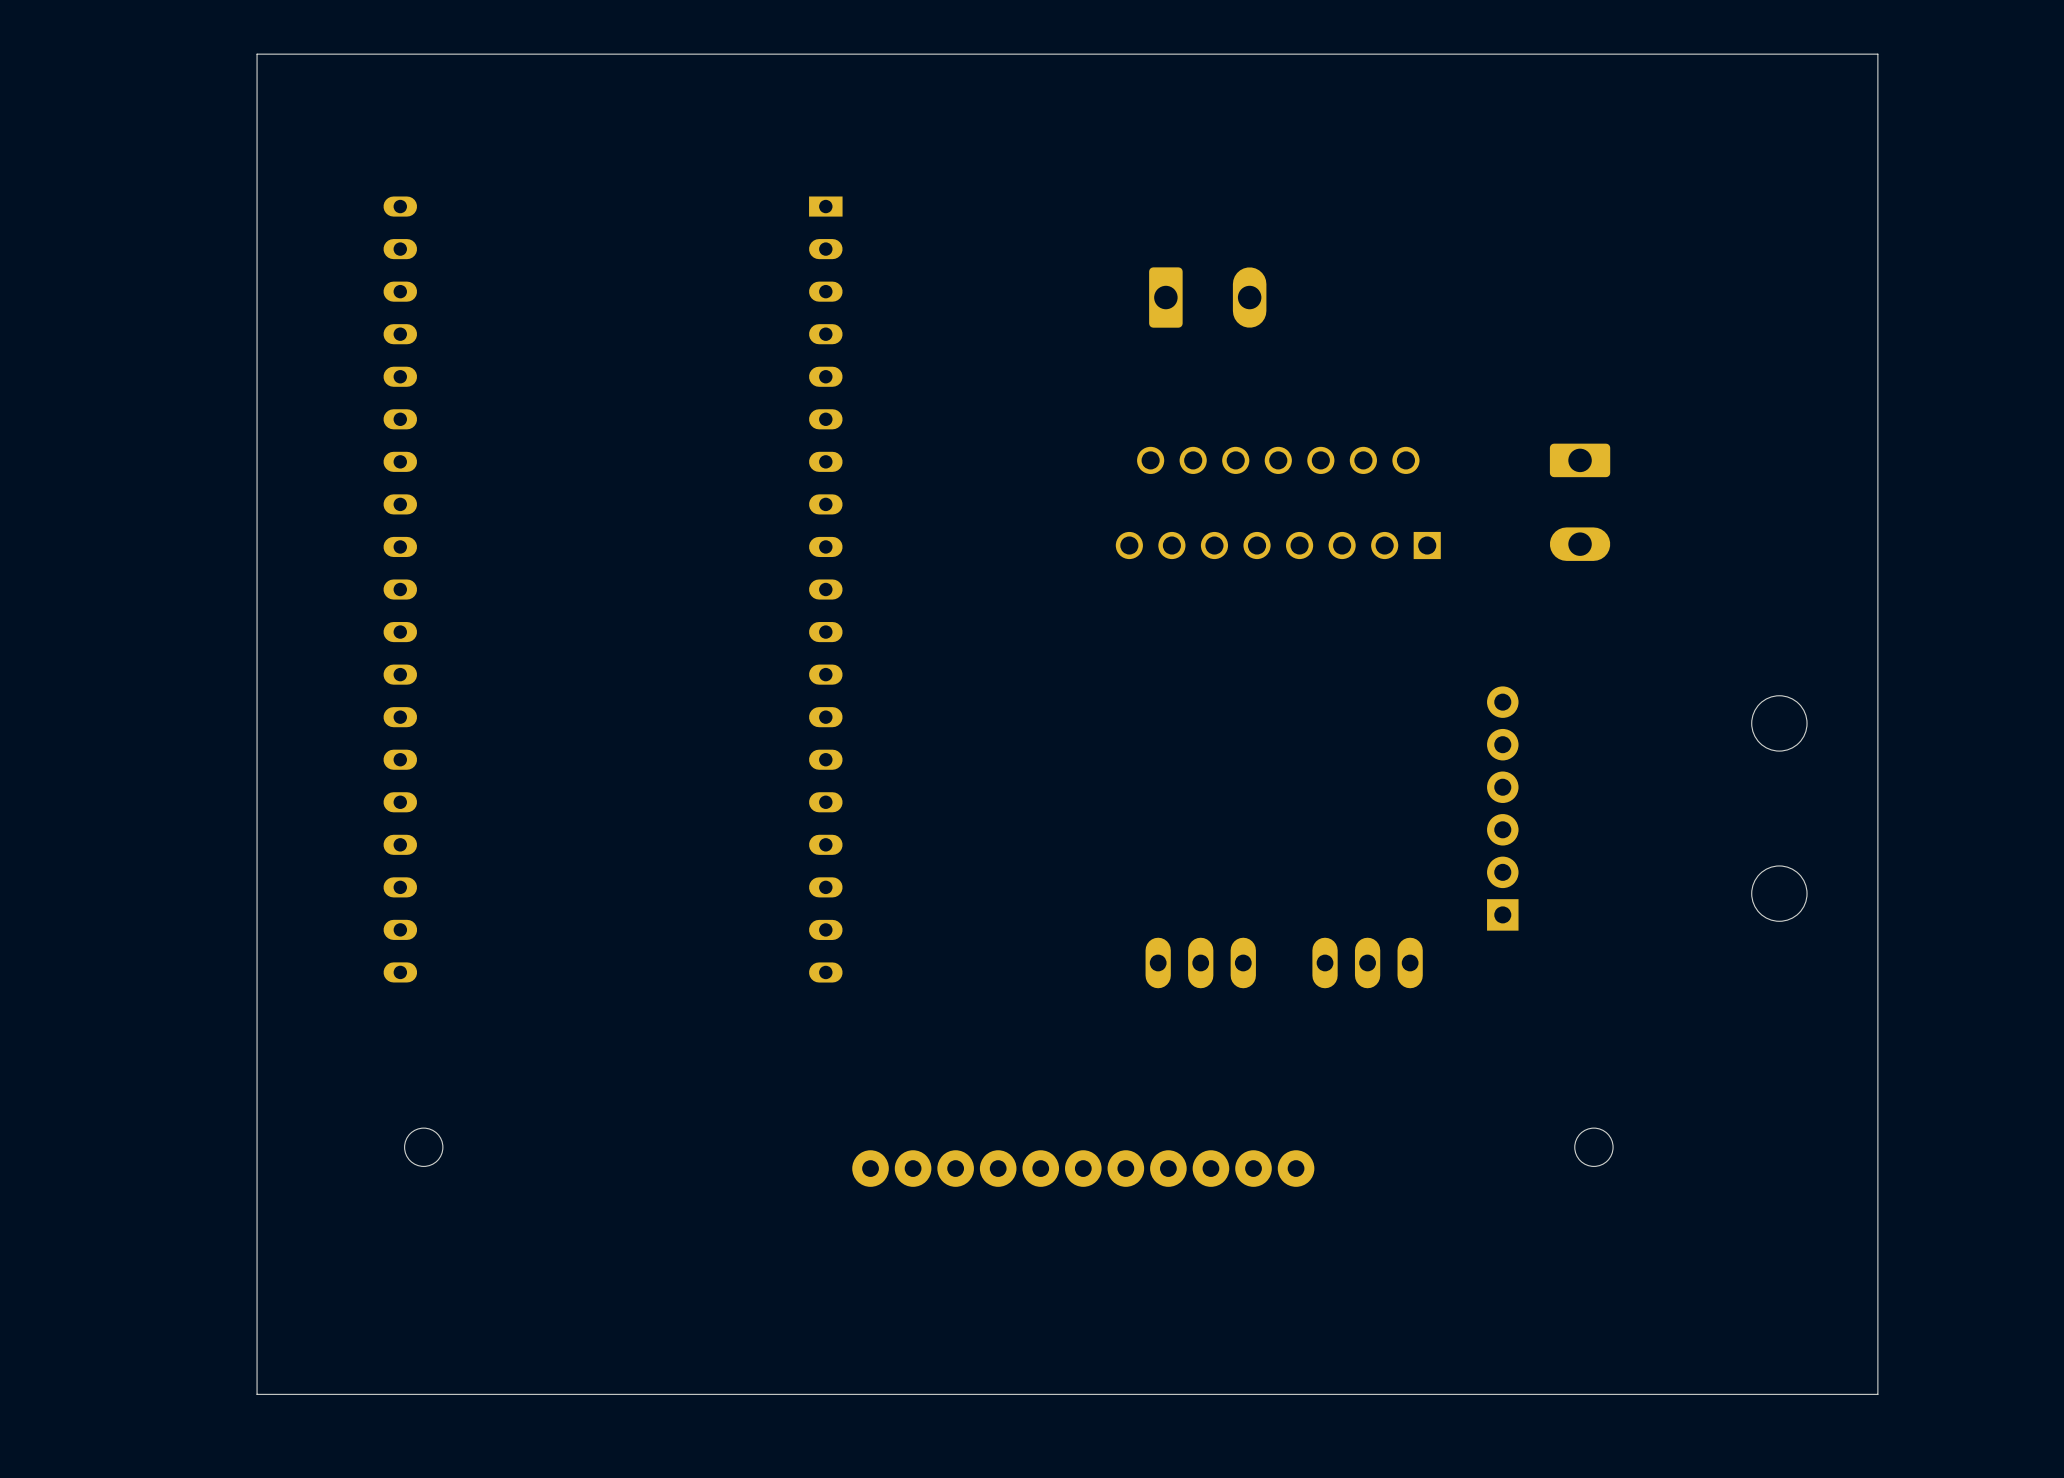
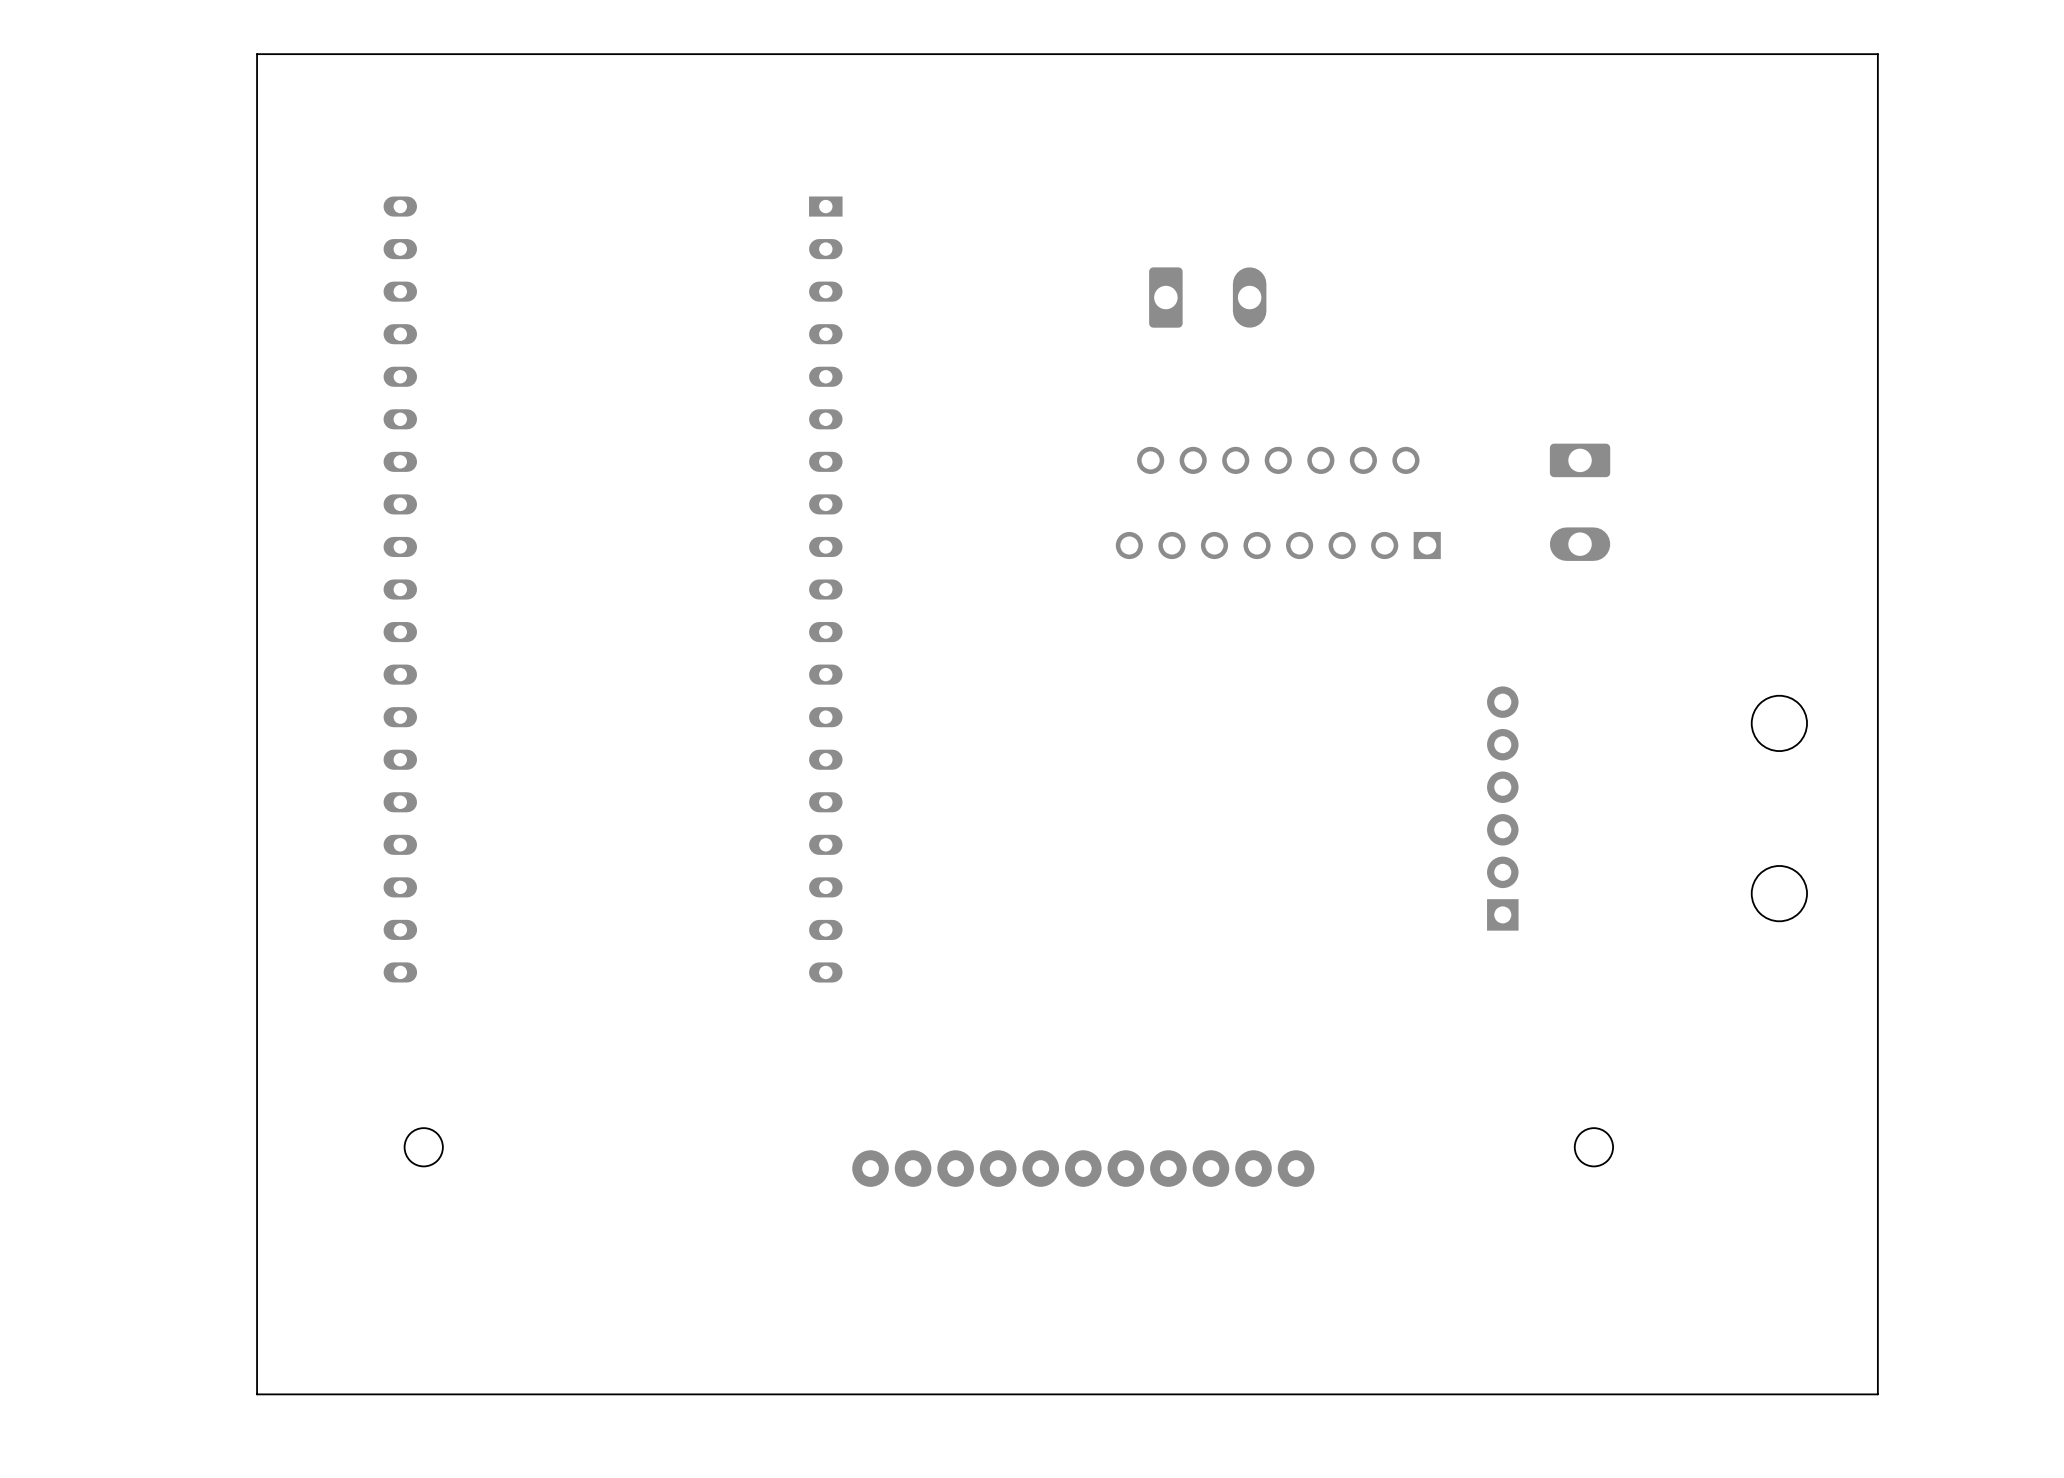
part: (1200, 962) -> none
part: (1367, 962) -> none

